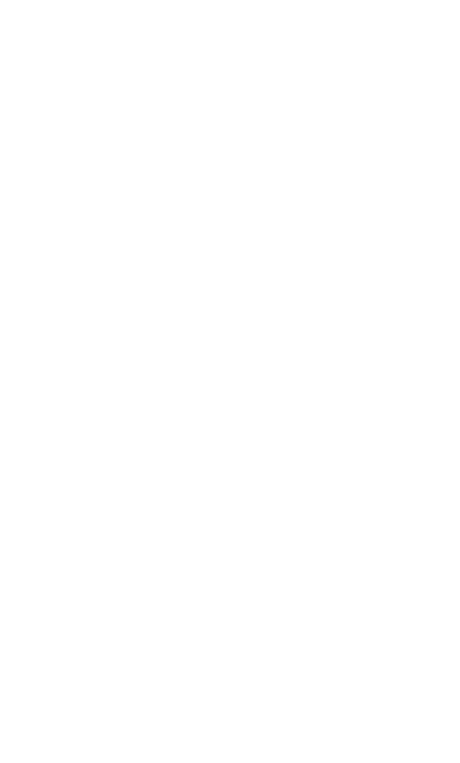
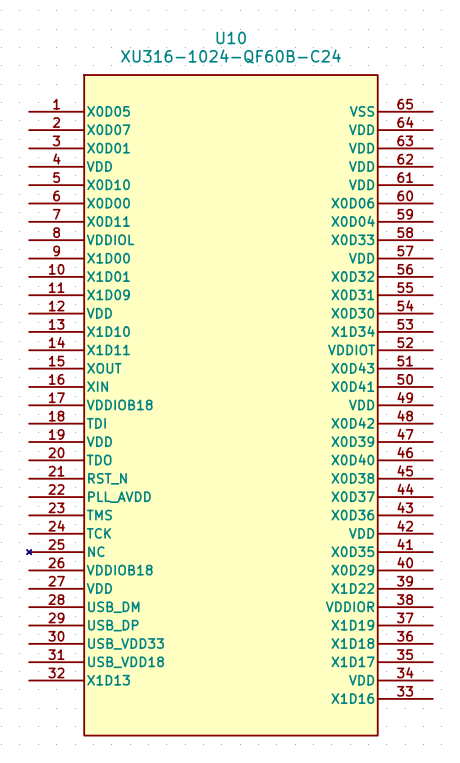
U10: none -> XU316-1024-QF60B-C24 (229, 405)

